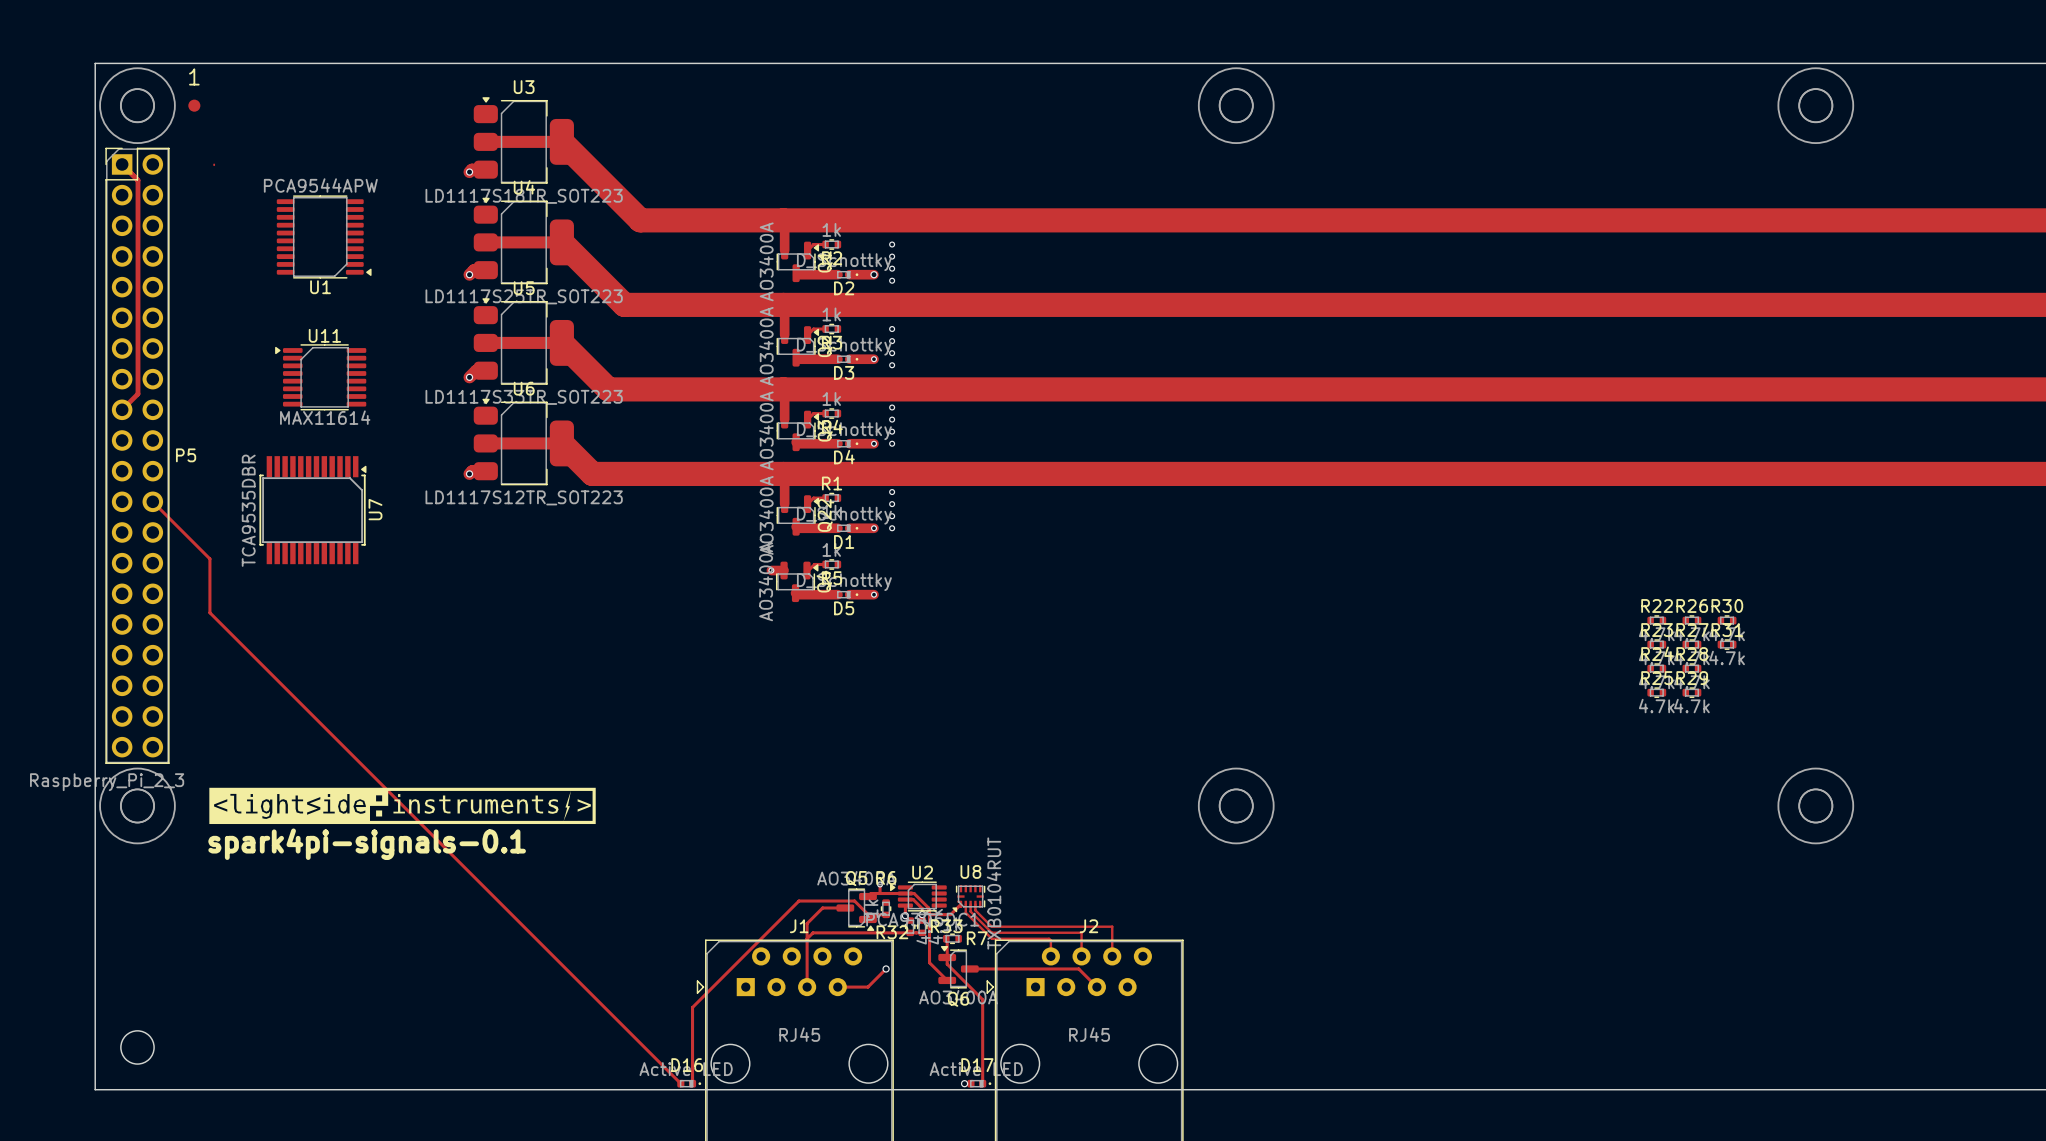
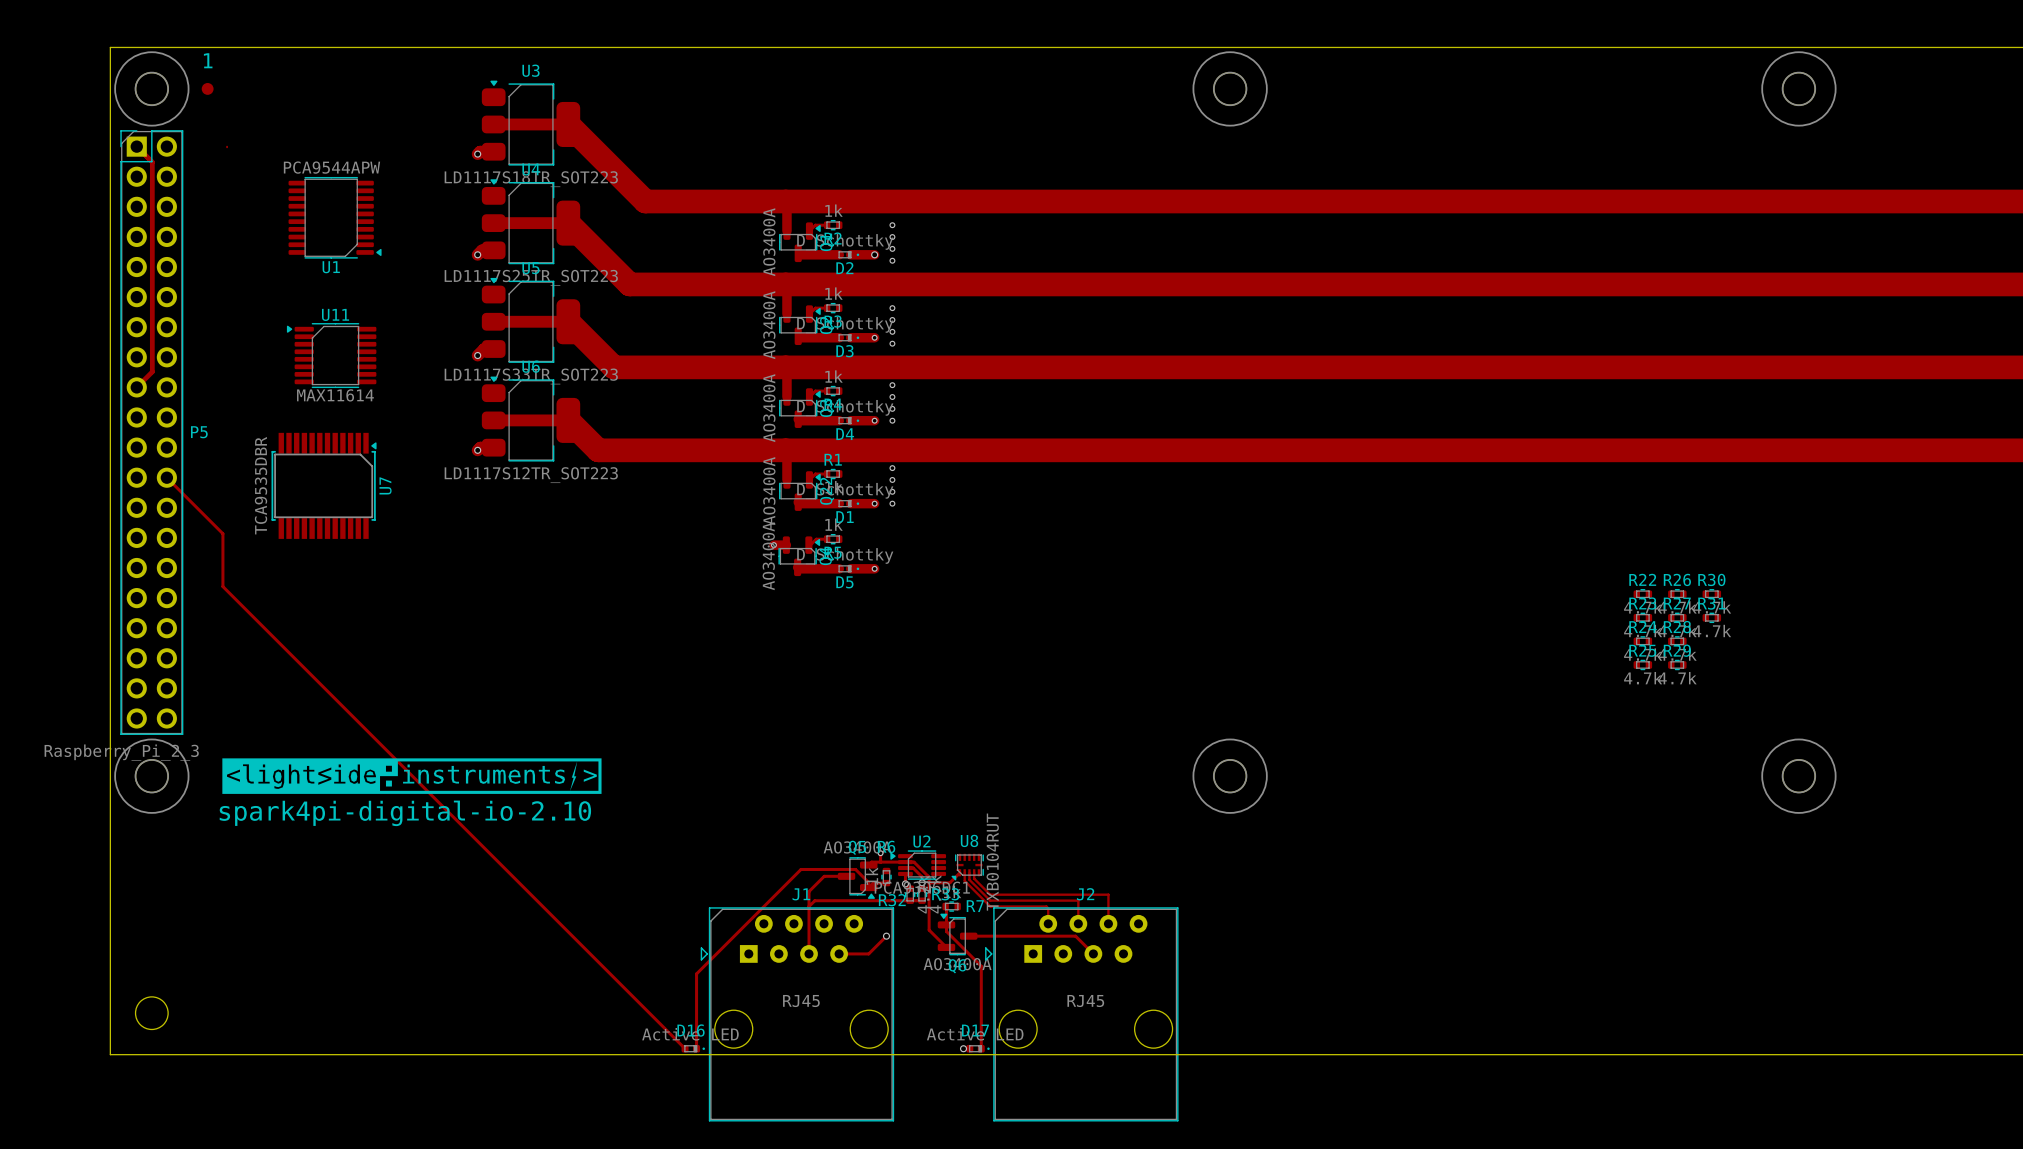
text: spark4pi-signals-0.1 (367, 844) -> spark4pi-digital-io-2.10 (405, 813)

